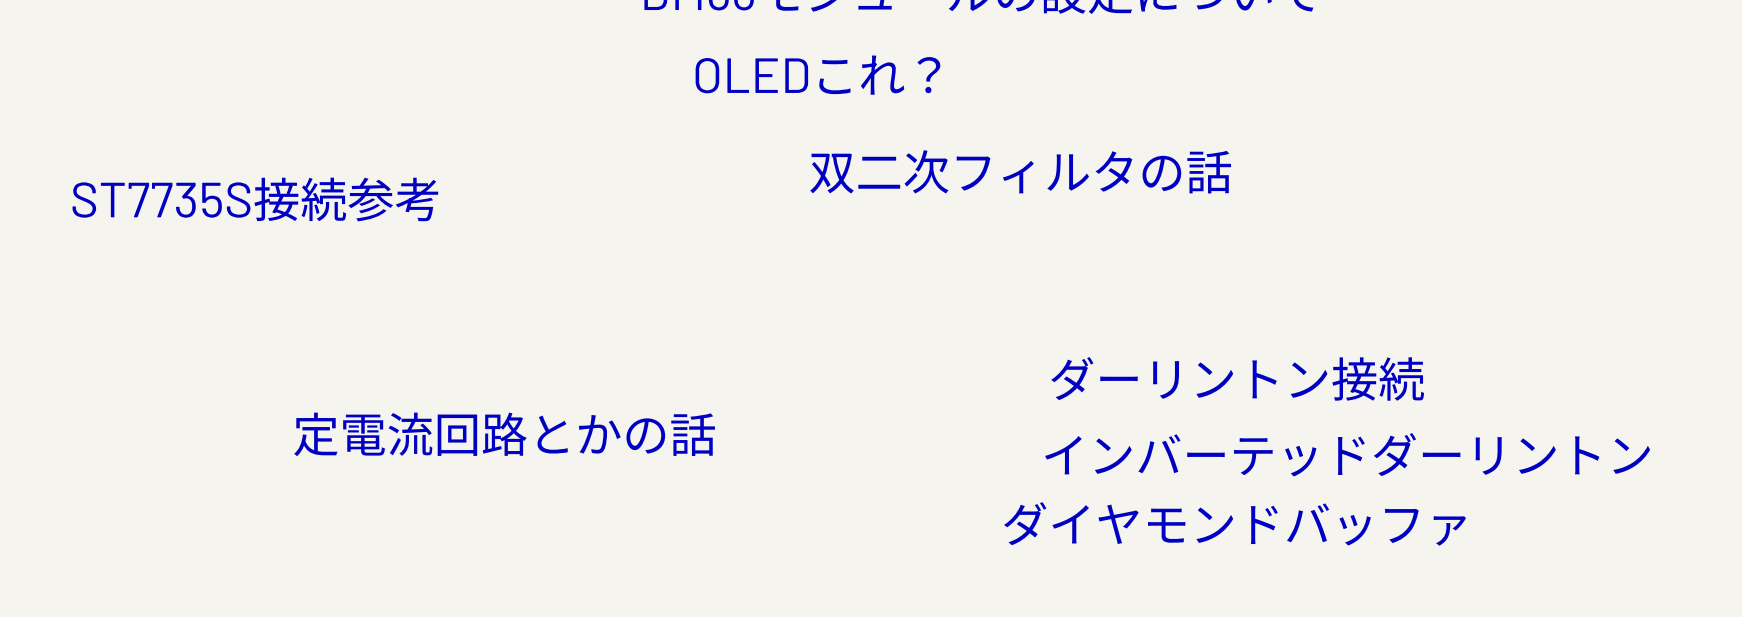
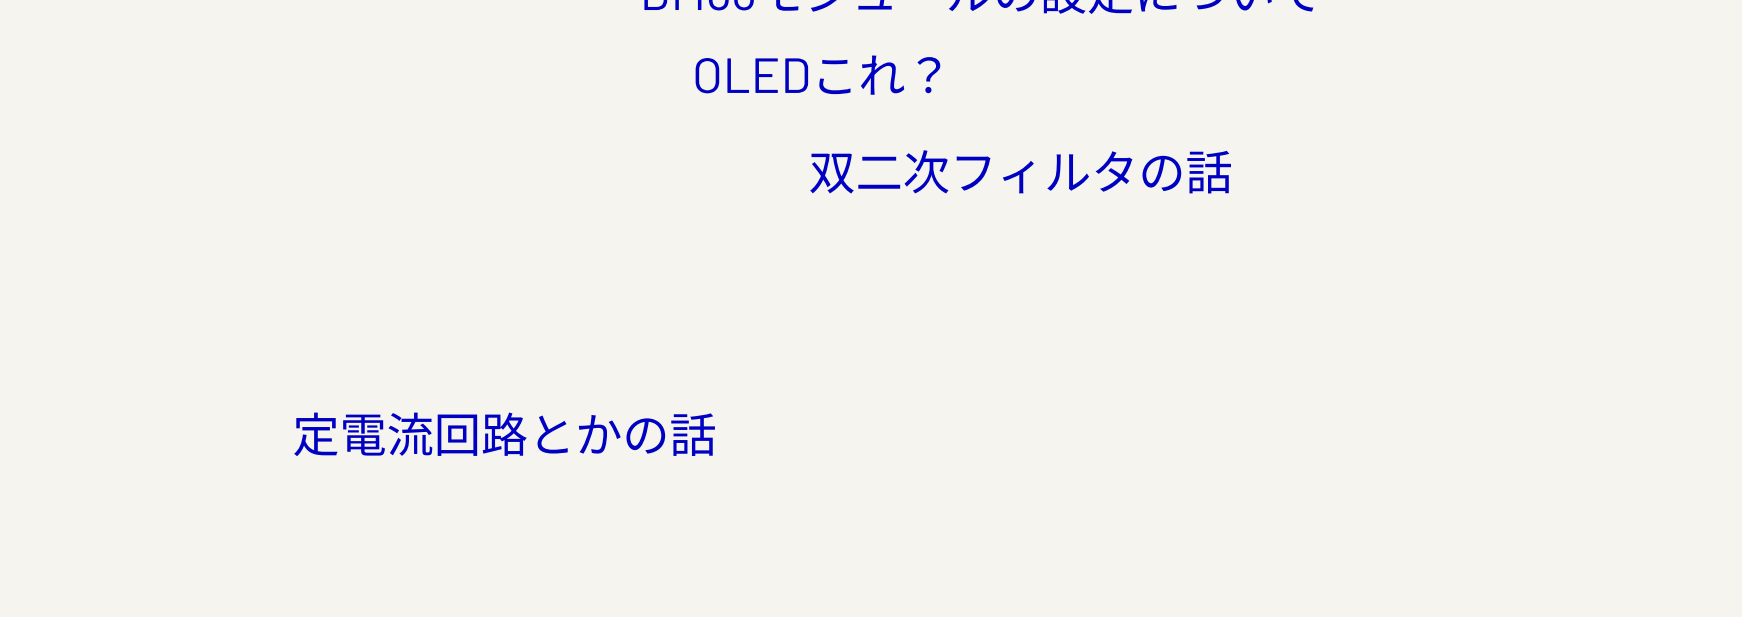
text: ST7735S接続参考 (255, 199) -> none
text: ダーリントン接続 (1237, 378) -> none
text: インバーテッドダーリントン (1347, 454) -> none
text: ダイヤモンドバッファ (1235, 523) -> none

